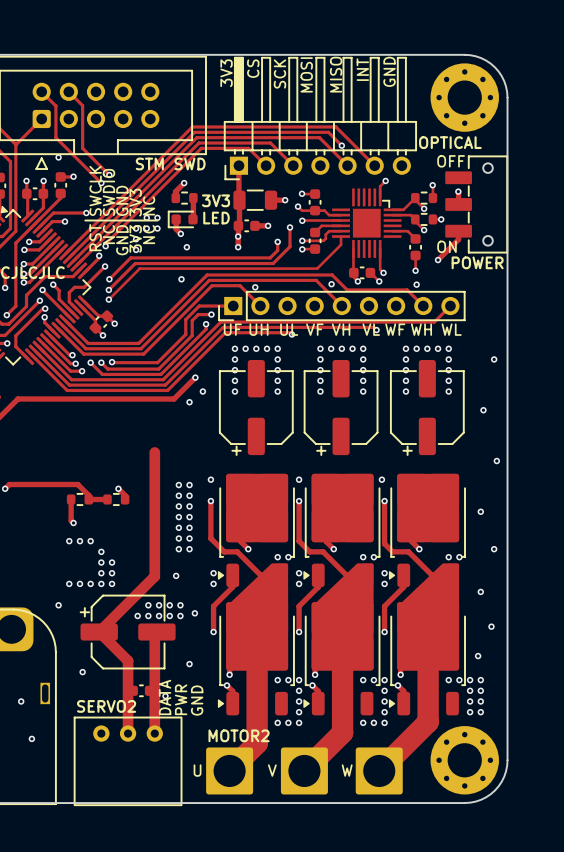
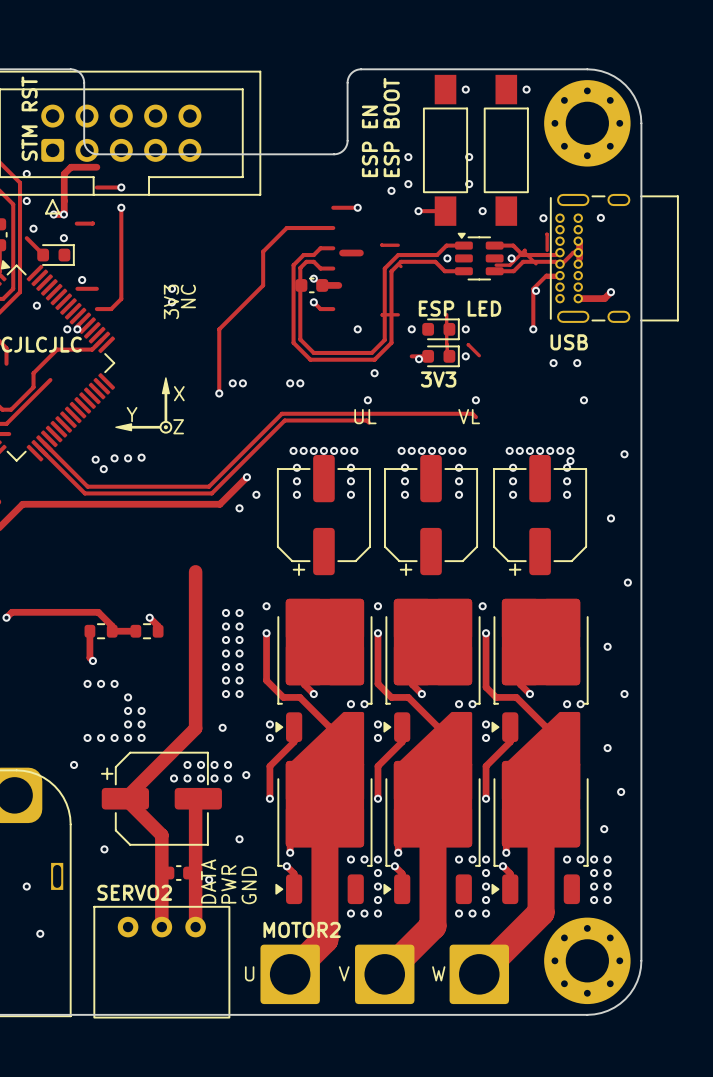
board edge: (55, 54) (285, 54) -> (70, 69) (79, 72) (83, 78) (84, 143) (89, 151) (97, 154) (338, 153) (344, 149) (347, 142) (347, 79) (352, 72) (361, 69)
text: CS (253, 68) -> none
text: INT (362, 69) -> none
via: none -> (465, 89)
via: none -> (526, 89)
text: GND (389, 71) -> none
text: 3V3 (226, 73) -> none
text: SCK (279, 73) -> none
text: MOSI (306, 74) -> none
text: MISO (336, 74) -> none
track: (41, 91) (55, 106) (55, 137) (101, 183) -> none
track: (68, 91) (82, 105) (82, 148) (109, 175) -> none
text: none -> STM RST (29, 118)
text: none -> ESP BOOT (391, 127)
text: none -> ESP EN (369, 141)
track: (41, 118) (15, 144) -> none
part: (320, 118) -> none
part: none -> (445, 150)
part: none -> (506, 150)
via: none -> (408, 157)
via: none -> (469, 157)
track: none -> (96, 167) (71, 167) (64, 173) (64, 214) (53, 214)
via: none -> (26, 173)
text: OPTICAL (450, 142) -> none
via: none -> (408, 184)
track: (341, 145) (328, 132) (194, 132) (69, 257) -> none
via: (341, 145) -> none
via: none -> (469, 184)
track: none -> (96, 187) (121, 187)
via: none -> (121, 187)
via: none -> (391, 190)
part footprint: [445, 155, 508, 254] -> [550, 193, 679, 323]
via: (58, 157) -> none
via: none -> (26, 201)
text: OFF (451, 161) -> none
text: STM SWD (170, 163) -> none
track: none -> (121, 207) (121, 298) (111, 309) (96, 309)
via: none -> (121, 207)
track: none -> (333, 207) (357, 207)
via: none -> (357, 207)
track: (238, 165) (238, 247) -> none
track: (266, 165) (248, 148) (201, 148) (105, 243) (105, 246) -> none
track: (293, 165) (270, 143) (199, 143) (76, 265) -> none
track: (347, 165) (319, 137) (196, 137) (73, 261) -> none
track: (374, 165) (335, 126) (192, 126) (65, 253) -> none
track: none -> (418, 211) (445, 211)
via: none -> (418, 211)
via: none -> (53, 214)
via: none -> (63, 214)
via: none -> (600, 217)
via: (109, 175) -> none
via: (73, 176) -> none
track: (26, 180) (27, 216) -> none
track: (43, 180) (43, 207) (31, 219) -> none
via: (43, 180) -> none
track: none -> (333, 228) (286, 228) (263, 251) (263, 285) (219, 329) (219, 393)
track: (385, 180) (380, 186) (380, 197) -> none
via position: (385, 180) -> (482, 211)
via: (101, 183) -> none
track: (184, 183) (175, 191) (175, 198) -> none
via: (184, 183) -> none
part: (60, 185) -> none
via position: (432, 185) -> (543, 218)
track: none -> (26, 238) (43, 255)
via: none -> (63, 238)
text: SWCLK (95, 190) -> none
via: (458, 191) -> none
text: SWDIO (108, 192) -> none
part: (35, 193) -> none
track: (60, 193) (60, 198) (15, 243) (15, 306) (6, 315) -> none
via: (302, 193) -> none
track: none -> (463, 245) (446, 245) (437, 255) (398, 255) (384, 268) (384, 340) (371, 352) (313, 352) (300, 339) (300, 267) (306, 261) (313, 261) (320, 268) (333, 268)
track: none -> (494, 245) (513, 245) (522, 255) (555, 255) (560, 252)
track: none -> (333, 248) (320, 248) (313, 255) (303, 255) (293, 265) (293, 342) (310, 359) (374, 359) (391, 342) (391, 271) (401, 261) (435, 261) (444, 271) (463, 271)
part: (184, 198) -> none
track: (193, 198) (193, 219) -> none
part: (424, 198) -> none
track: none -> (578, 252) (573, 252) (561, 264) (555, 261) (523, 261) (513, 271) (494, 271)
text: GND (122, 200) -> none
text: 3V3 (215, 200) -> none
part: (255, 200) -> none
via: (285, 200) -> none
part: none -> (55, 255)
text: 3V3 (135, 202) -> none
part: (315, 202) -> none
part: none -> (479, 256)
via: none -> (447, 258)
via: none -> (511, 258)
text: NC (149, 205) -> none
track: (298, 206) (302, 210) (324, 210) (329, 215) (341, 215) -> none
via: (298, 206) -> none
via: (424, 208) -> none
track: (86, 213) (53, 213) (39, 227) -> none
via: (86, 213) -> none
track: (392, 215) (411, 215) (424, 230) -> none
via: (146, 217) -> none
via: (157, 217) -> none
text: LED (216, 218) -> none
track: none -> (560, 275) (546, 275) (533, 288) (533, 329)
track: (176, 219) (176, 229) (180, 233) -> none
part: (182, 219) -> none
part: (424, 219) -> none
via: (441, 219) -> none
line: (85, 220) (157, 220) -> none
via: none -> (313, 278)
via: (302, 220) -> none
track: (341, 220) (302, 220) -> none
track: (65, 221) (52, 221) (42, 231) -> none
part: (366, 223) -> none
via: (268, 225) -> none
track: (341, 225) (321, 225) (315, 232) -> none
track: (290, 227) (290, 246) (273, 263) (135, 263) (108, 289) -> none
via: (290, 227) -> none
track: none -> (77, 288) (96, 288)
via: (146, 228) -> none
via: (157, 228) -> none
track: (341, 231) (329, 231) (323, 240) (302, 240) -> none
track: (392, 231) (407, 231) (414, 239) -> none
track: (458, 231) (458, 239) (438, 260) -> none
track: none -> (610, 292) (604, 298) (578, 298)
via: none -> (610, 292)
via: (180, 233) -> none
track: (46, 234) (39, 241) (29, 241) -> none
text: NC (108, 234) -> none
via: (238, 236) -> none
track: (341, 236) (341, 244) (317, 268) (139, 268) (108, 299) -> none
text: RST (95, 237) -> none
track: (50, 238) (39, 249) (24, 249) -> none
track: none -> (313, 302) (320, 309) (333, 309)
via: none -> (313, 302)
text: GND (122, 240) -> none
via: (302, 240) -> none
part: (315, 240) -> none
track: (277, 241) (277, 250) (270, 257) (130, 257) (109, 279) -> none
via: (277, 241) -> none
track: (54, 242) (32, 264) (23, 264) -> none
text: none -> ESP LED (460, 308)
track: (57, 246) (30, 273) (23, 273) -> none
via: (105, 246) -> none
text: ON (447, 246) -> none
via: (186, 247) -> none
via: (238, 247) -> none
part: (415, 247) -> none
track: (380, 248) (380, 269) (383, 272) -> none
via: (24, 249) -> none
via: (136, 249) -> none
via: (302, 249) -> none
track: (61, 250) (29, 282) (23, 282) -> none
track: (99, 255) (84, 272) -> none
via: (99, 255) -> none
track: (415, 255) (415, 270) -> none
via: none -> (67, 329)
via: none -> (77, 329)
via: none -> (357, 329)
via: none -> (411, 329)
part: none -> (440, 329)
via: none -> (465, 329)
via: none -> (533, 329)
via: (438, 260) -> none
text: POWER (477, 262) -> none
via: (23, 264) -> none
track: (105, 266) (84, 287) (74, 287) (69, 292) (69, 301) (76, 309) -> none
via: (105, 266) -> none
via: (415, 270) -> none
text: none -> USB (569, 342)
part: (362, 272) -> none
via: (383, 272) -> none
via: (23, 273) -> none
via: (109, 279) -> none
via: (181, 279) -> none
track: none -> (411, 356) (428, 356)
part: none -> (440, 356)
via: (357, 281) -> none
via: none -> (465, 356)
via: (379, 281) -> none
via: (23, 282) -> none
track: (53, 284) (59, 290) (59, 299) (73, 313) -> none
via: (53, 284) -> none
via: (416, 284) -> none
via: (5, 287) -> none
via: (255, 287) -> none
via: none -> (553, 363)
via: none -> (577, 363)
track: (42, 289) (69, 316) -> none
via: (42, 289) -> none
via: (108, 289) -> none
via: none -> (374, 373)
drawing: none -> [115, 377, 172, 434]
via: (108, 299) -> none
via: (39, 300) -> none
text: none -> 3V3 (438, 379)
track: (84, 301) (98, 316) (107, 316) (114, 323) -> none
via: none -> (232, 383)
via: none -> (242, 383)
via: none -> (290, 383)
via: none -> (300, 383)
track: (80, 305) (95, 320) (95, 327) (102, 335) -> none
track: (233, 306) (199, 306) (185, 319) (185, 334) (157, 362) (112, 362) -> none
track: (260, 306) (240, 285) (212, 285) (143, 354) (83, 354) (57, 328) -> none
track: (341, 306) (316, 280) (209, 280) (140, 348) (85, 348) (61, 324) -> none
part: (341, 306) -> none
track: (423, 306) (407, 289) (347, 289) (332, 275) (207, 275) (138, 343) (88, 343) (65, 320) -> none
track: (450, 306) (434, 322) (220, 322) (163, 379) (71, 379) (39, 347) -> none
track: (45, 308) (42, 308) (15, 335) (15, 346) (27, 358) -> none
via: (45, 308) -> none
text: none -> X (179, 393)
via: none -> (219, 393)
track: (211, 314) (198, 314) (192, 320) (192, 335) (158, 369) (107, 369) (101, 362) -> none
via: (211, 314) -> none
via: (6, 315) -> none
via: none -> (367, 400)
via: none -> (583, 400)
track: (44, 317) (44, 322) (54, 332) -> none
via: (44, 317) -> none
part: (101, 322) -> none
via: (114, 323) -> none
track: (206, 324) (206, 329) (160, 374) (102, 374) (90, 362) -> none
via: (206, 324) -> none
text: none -> Y (132, 414)
text: UF (232, 329) -> none
text: UH (259, 329) -> none
text: VF (314, 329) -> none
text: VH (341, 329) -> none
text: WF (395, 329) -> none
text: WH (421, 329) -> none
text: WL (451, 329) -> none
via position: (376, 330) -> (475, 400)
via: (291, 334) -> none
track: (50, 335) (69, 355) (72, 355) -> none
via: (102, 335) -> none
text: none -> Z (178, 426)
track: (46, 339) (70, 363) (75, 363) -> none
via: (7, 343) -> none
track: (42, 343) (70, 371) (82, 371) -> none
via: (234, 348) -> none
via: (245, 348) -> none
via: (256, 348) -> none
via: (267, 348) -> none
via: (277, 348) -> none
via: (320, 348) -> none
via: (331, 348) -> none
via: (341, 348) -> none
via: (352, 348) -> none
via: (363, 348) -> none
via: (405, 348) -> none
via: (416, 348) -> none
via: (427, 348) -> none
via: (438, 348) -> none
via: (448, 348) -> none
via: (72, 355) -> none
via: none -> (293, 450)
via: none -> (303, 450)
via: none -> (313, 450)
via: none -> (323, 450)
via: none -> (334, 450)
via: none -> (344, 450)
via: none -> (354, 450)
via: none -> (401, 450)
via: none -> (411, 450)
via: none -> (421, 450)
via: none -> (432, 450)
via: none -> (442, 450)
via: none -> (452, 450)
via: none -> (462, 450)
via: none -> (509, 450)
via: none -> (519, 450)
via: none -> (529, 450)
via: none -> (540, 450)
via: none -> (550, 450)
via: none -> (560, 450)
via: none -> (570, 450)
via: (234, 359) -> none
via: (277, 359) -> none
via: (320, 359) -> none
via: (363, 359) -> none
via: (405, 359) -> none
via: (448, 359) -> none
via: none -> (570, 461)

